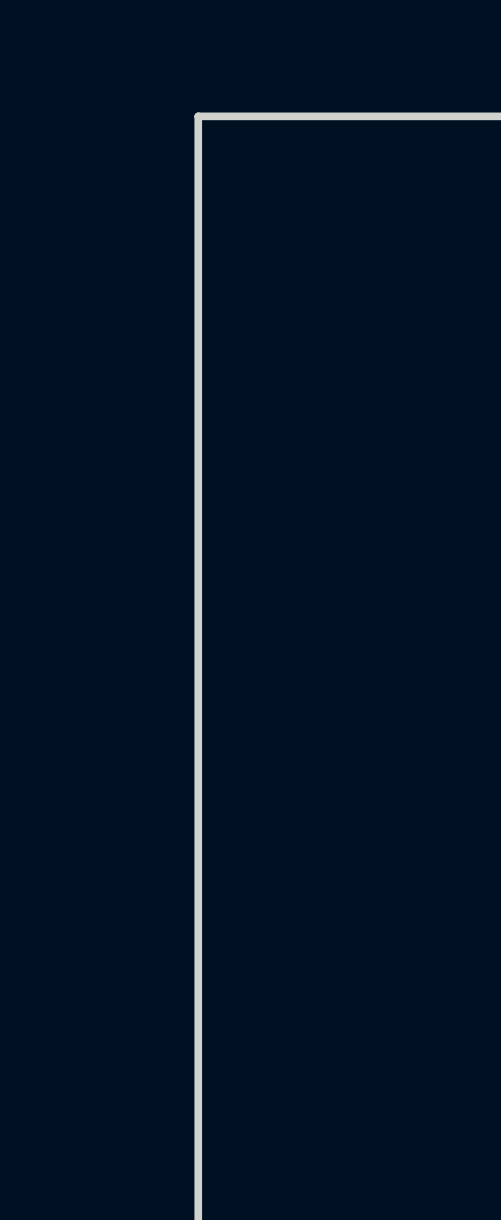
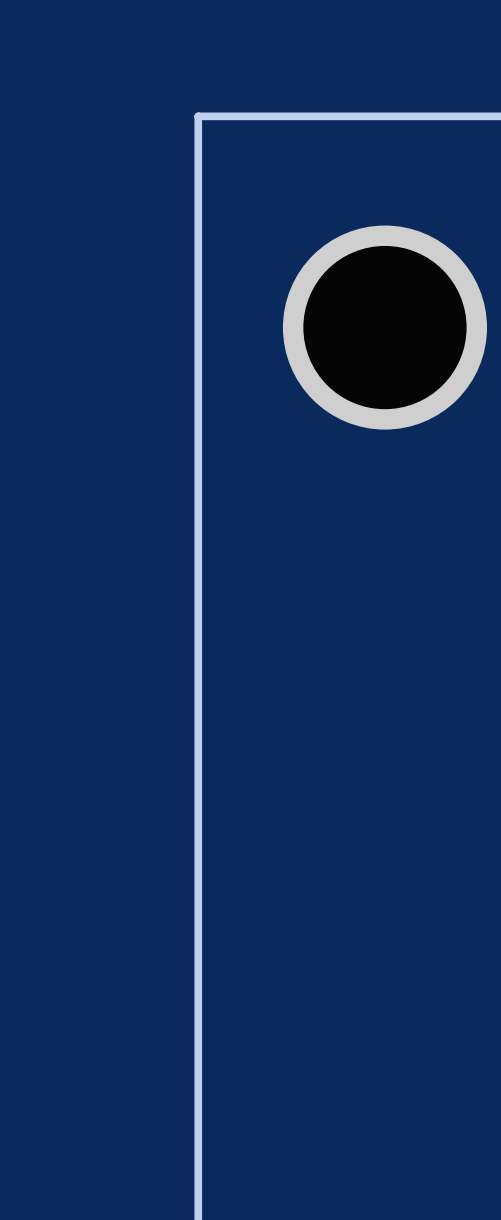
part: none -> (384, 327)

